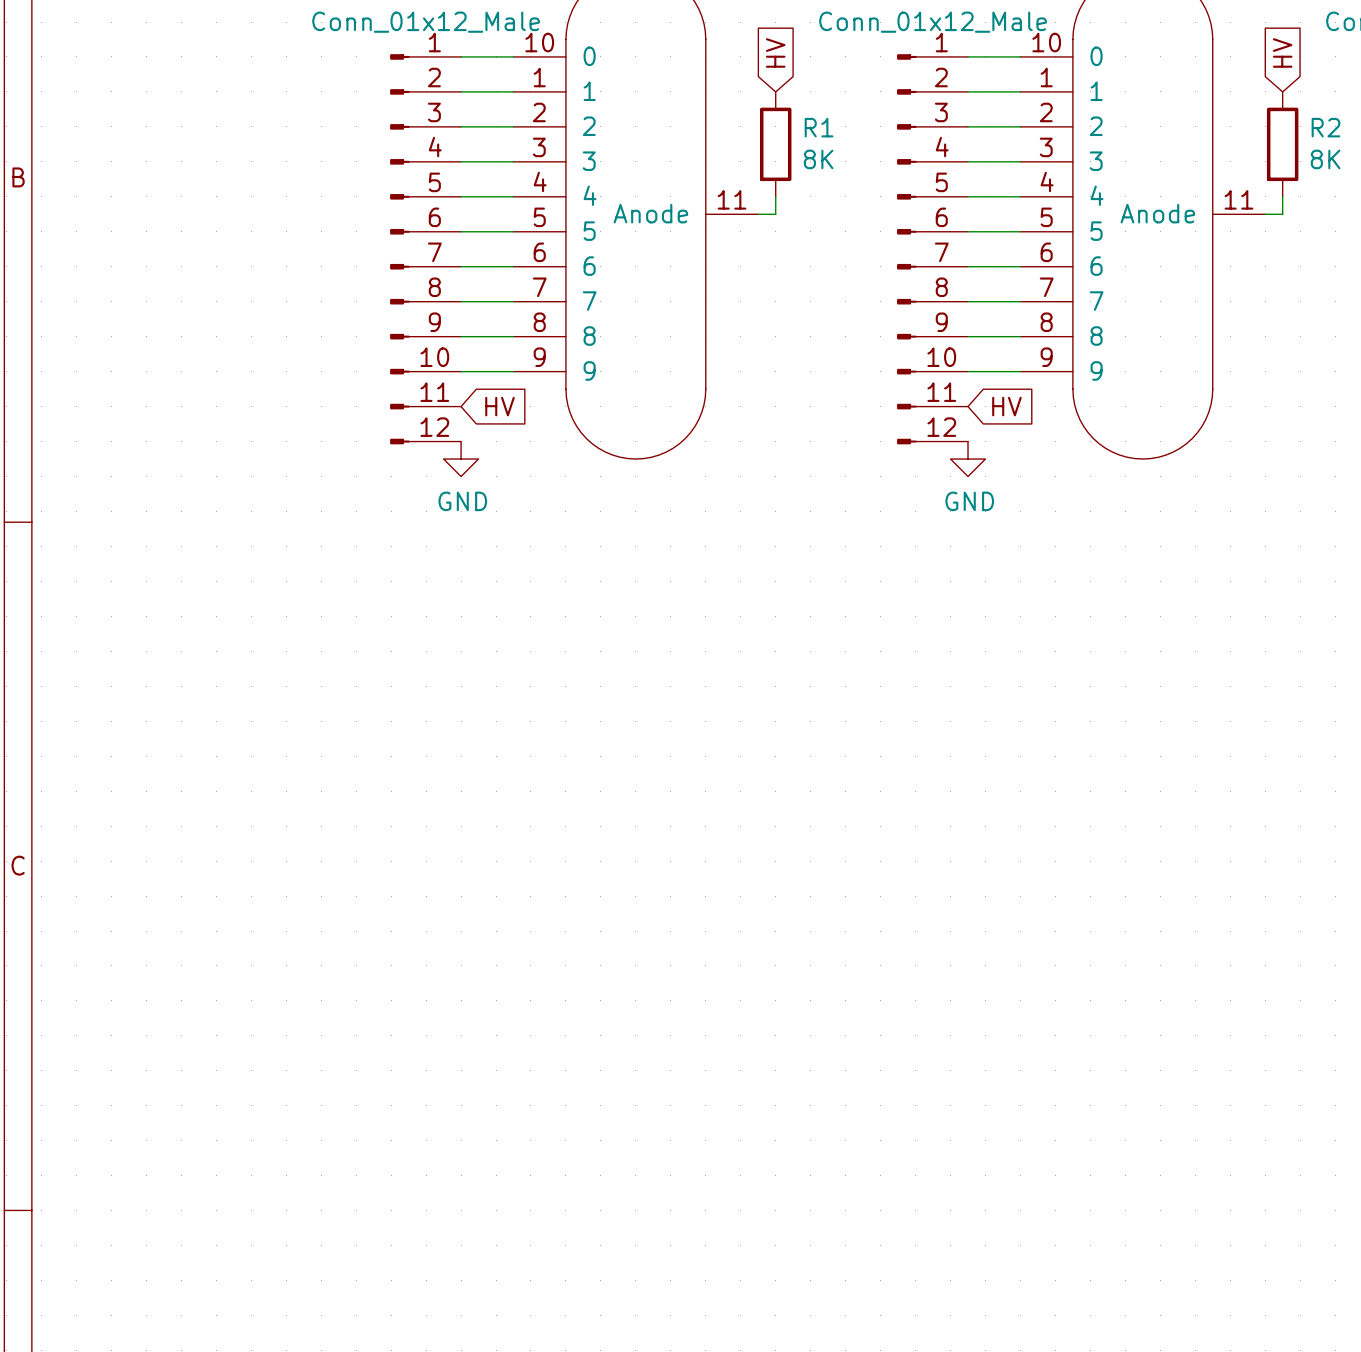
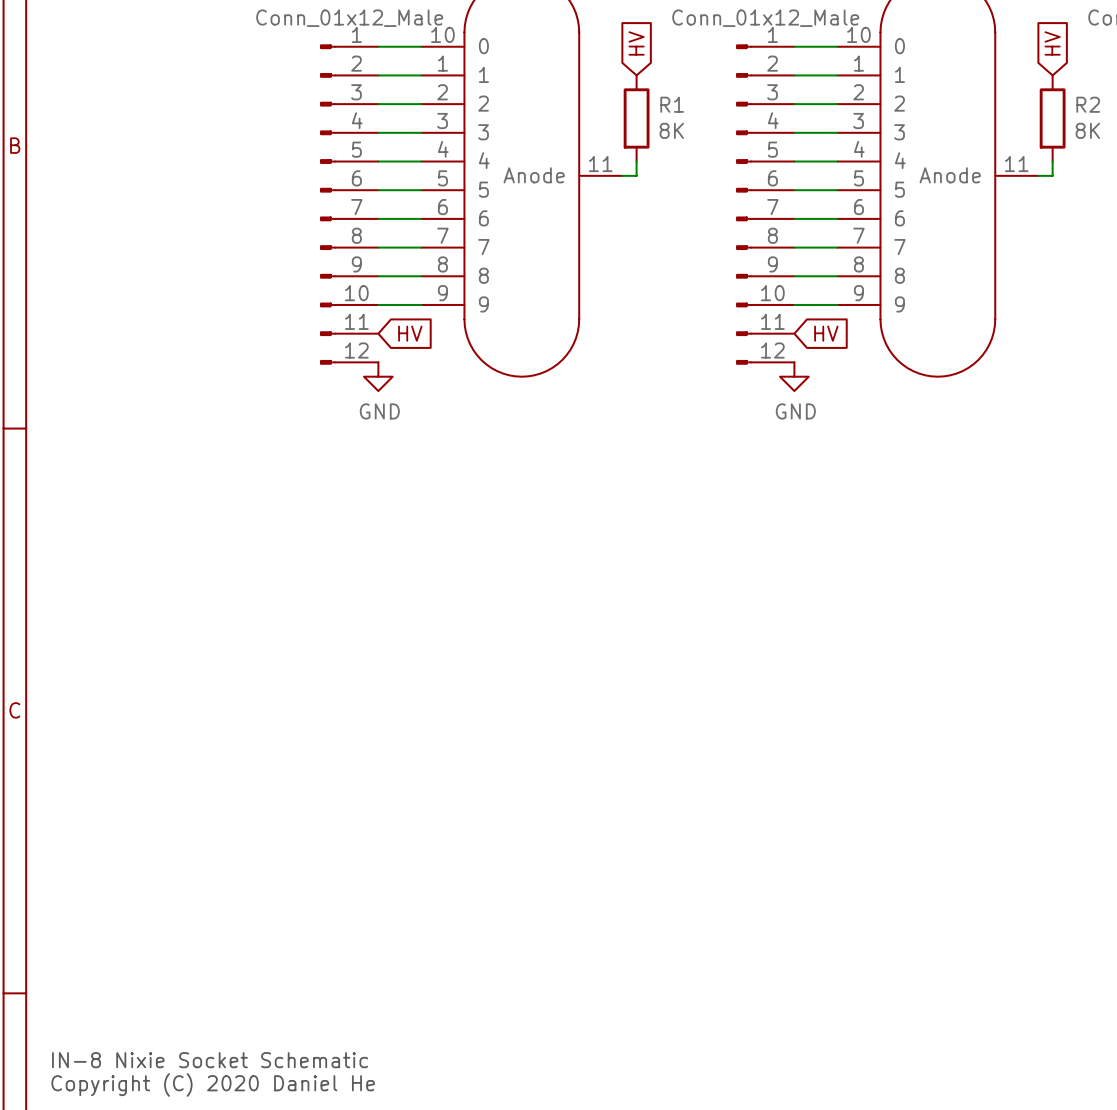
text: none -> IN-8 Nixie Socket Schematic (210, 1060)
text: none -> Copyright (C) 2020 Daniel He (213, 1084)

